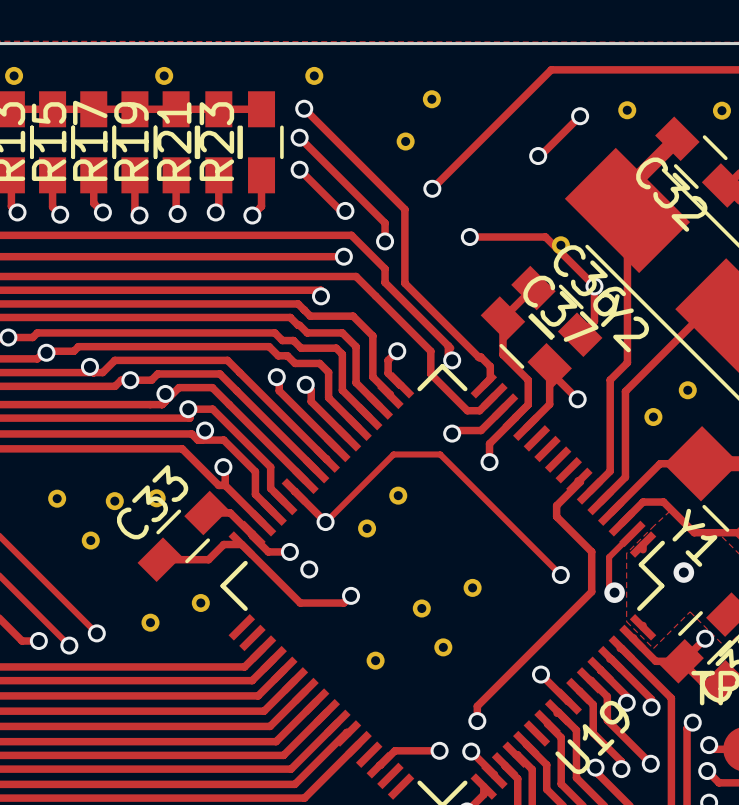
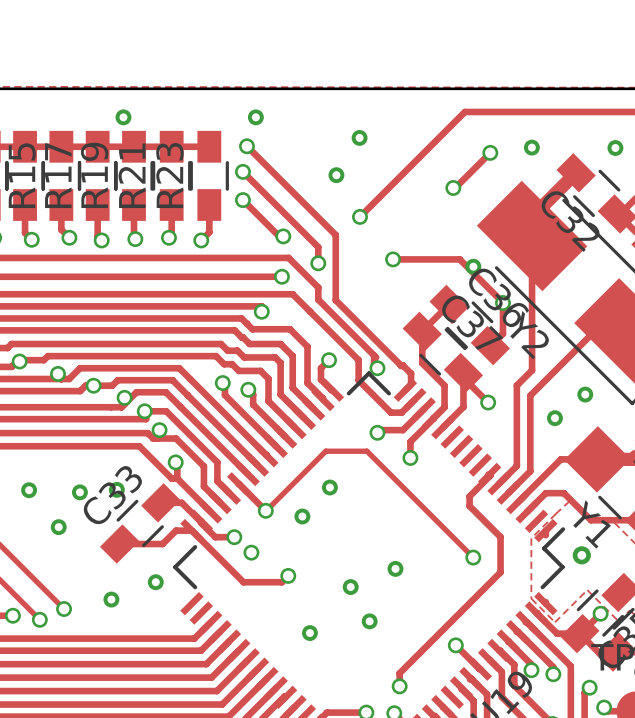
track: (632, 533) (609, 557) (609, 587) (614, 592) -> none
via: (614, 592) -> none

